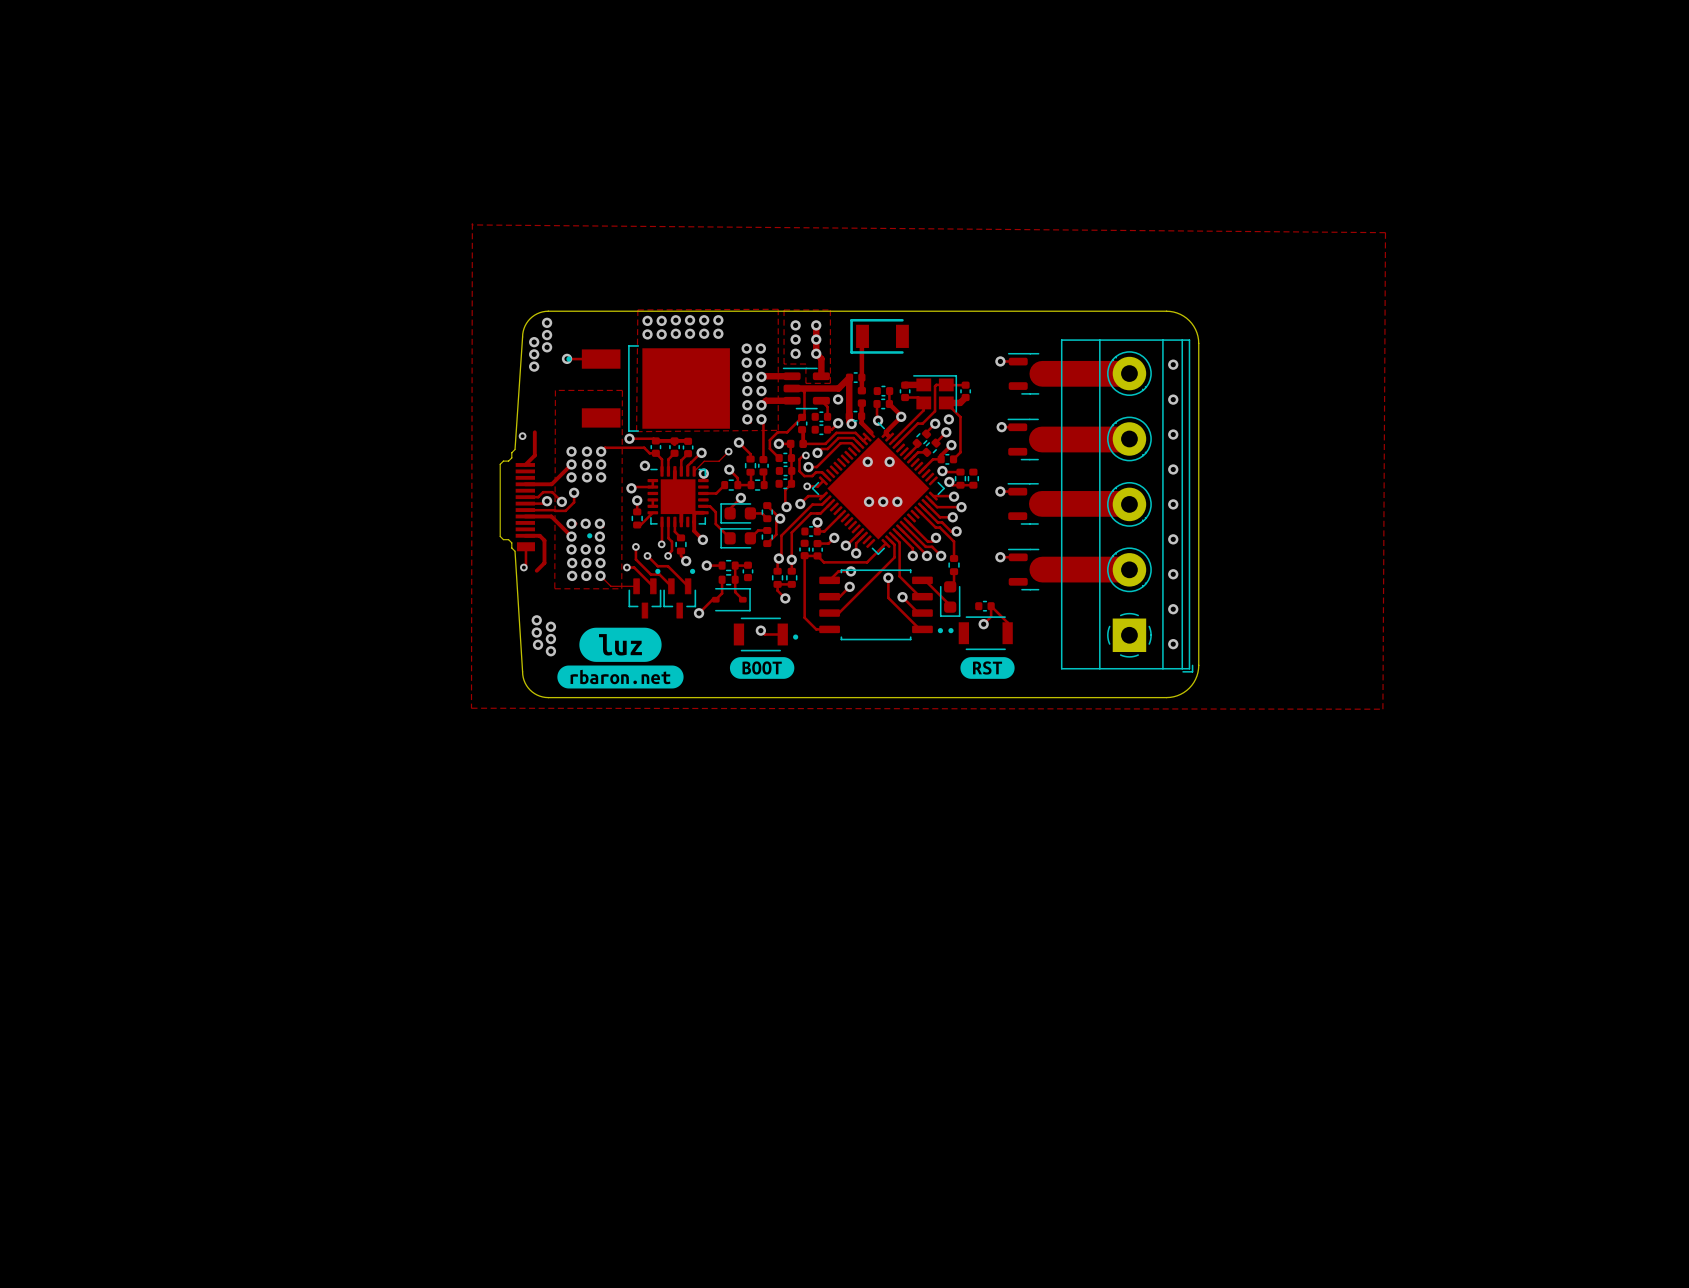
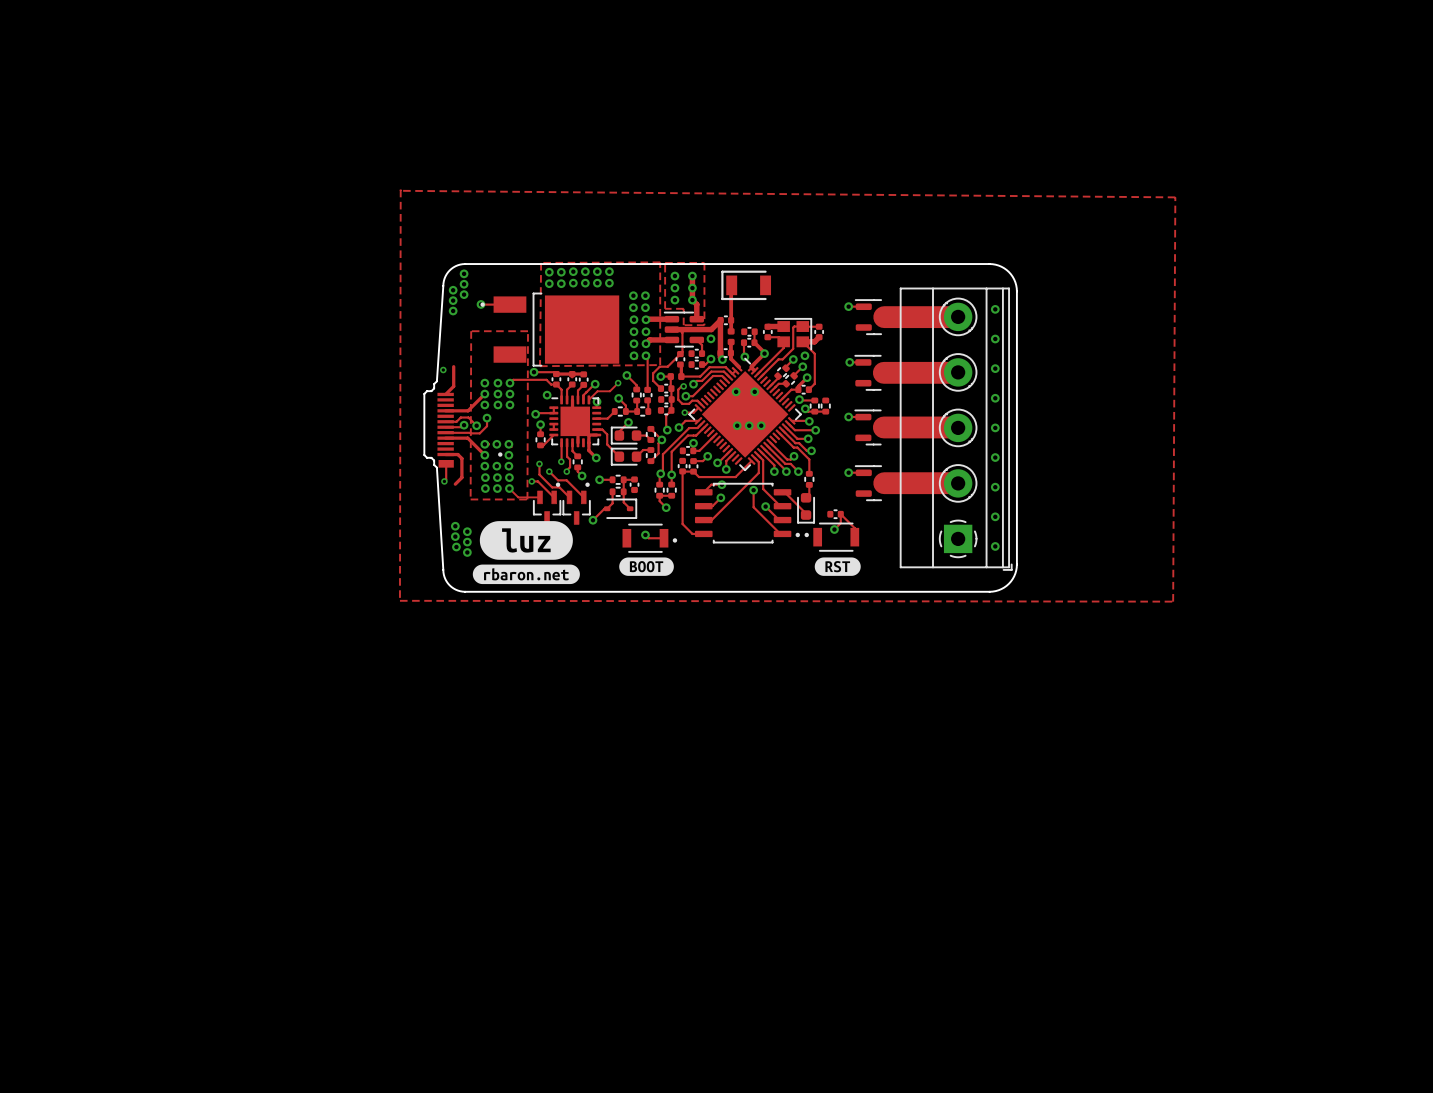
drawing shape: [579, 627, 662, 662] -> [479, 521, 573, 560]

